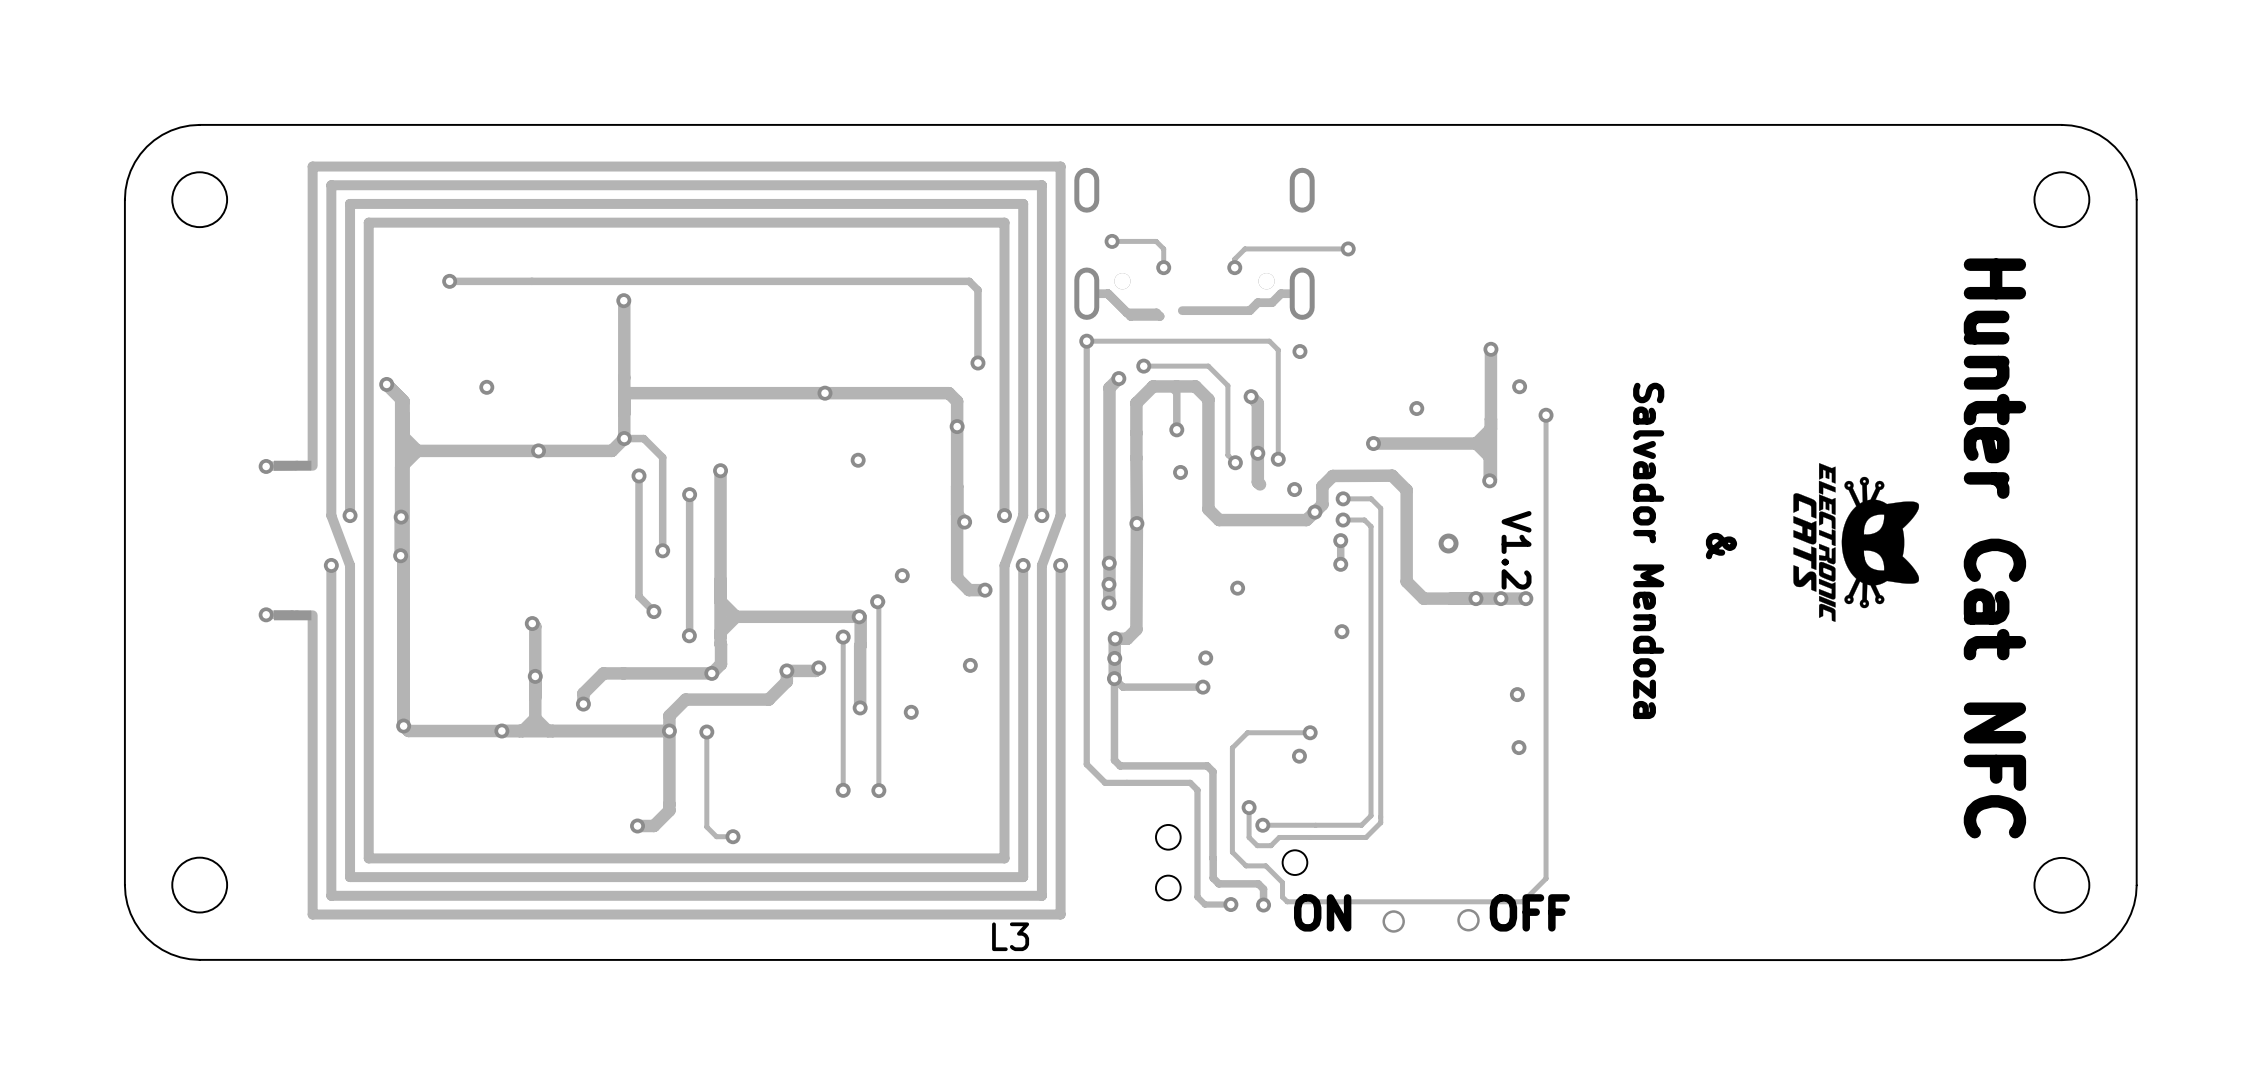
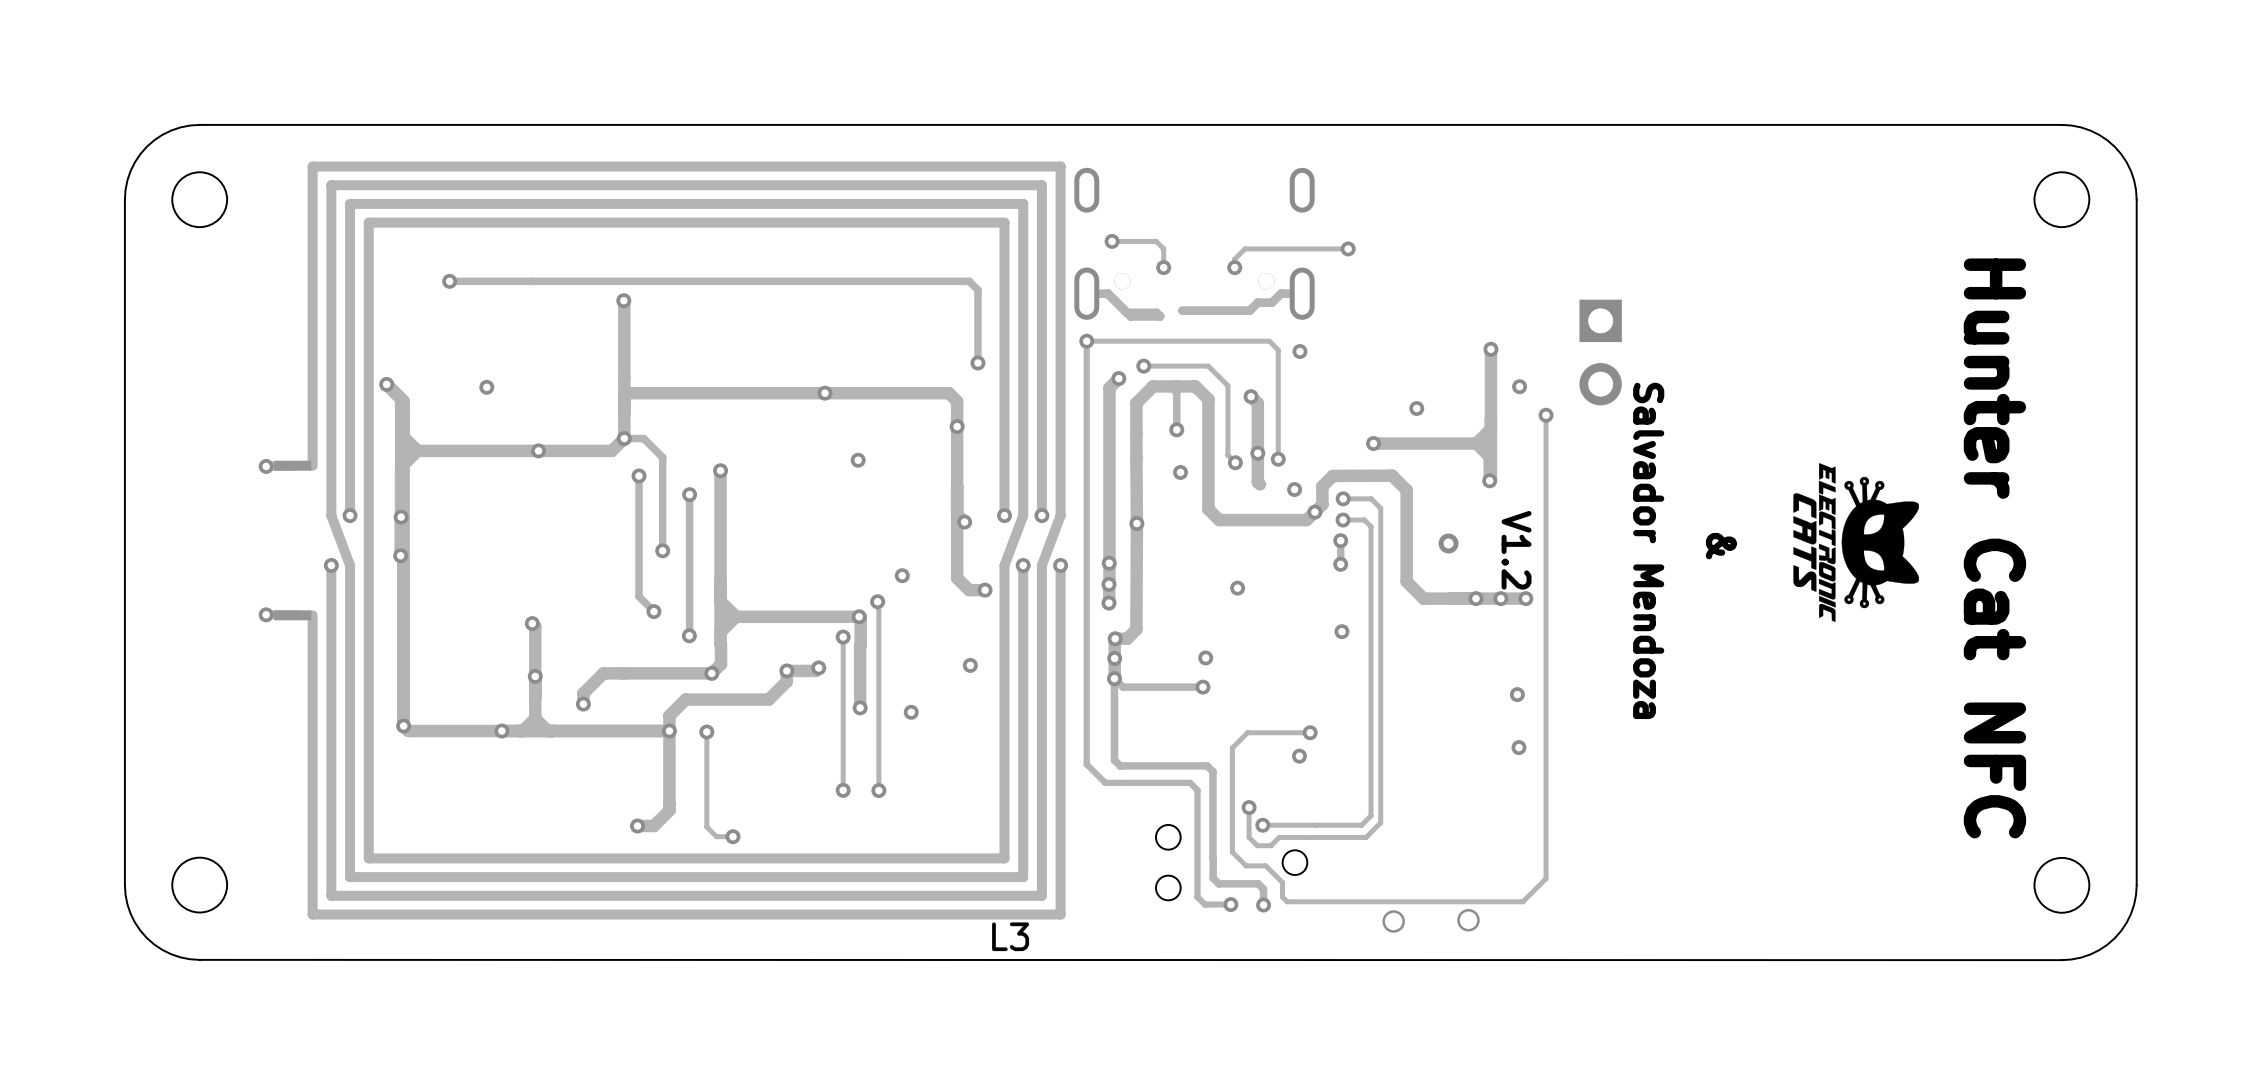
part: none -> (1600, 352)
text: ON (1322, 912) -> none
text: OFF (1529, 912) -> none

